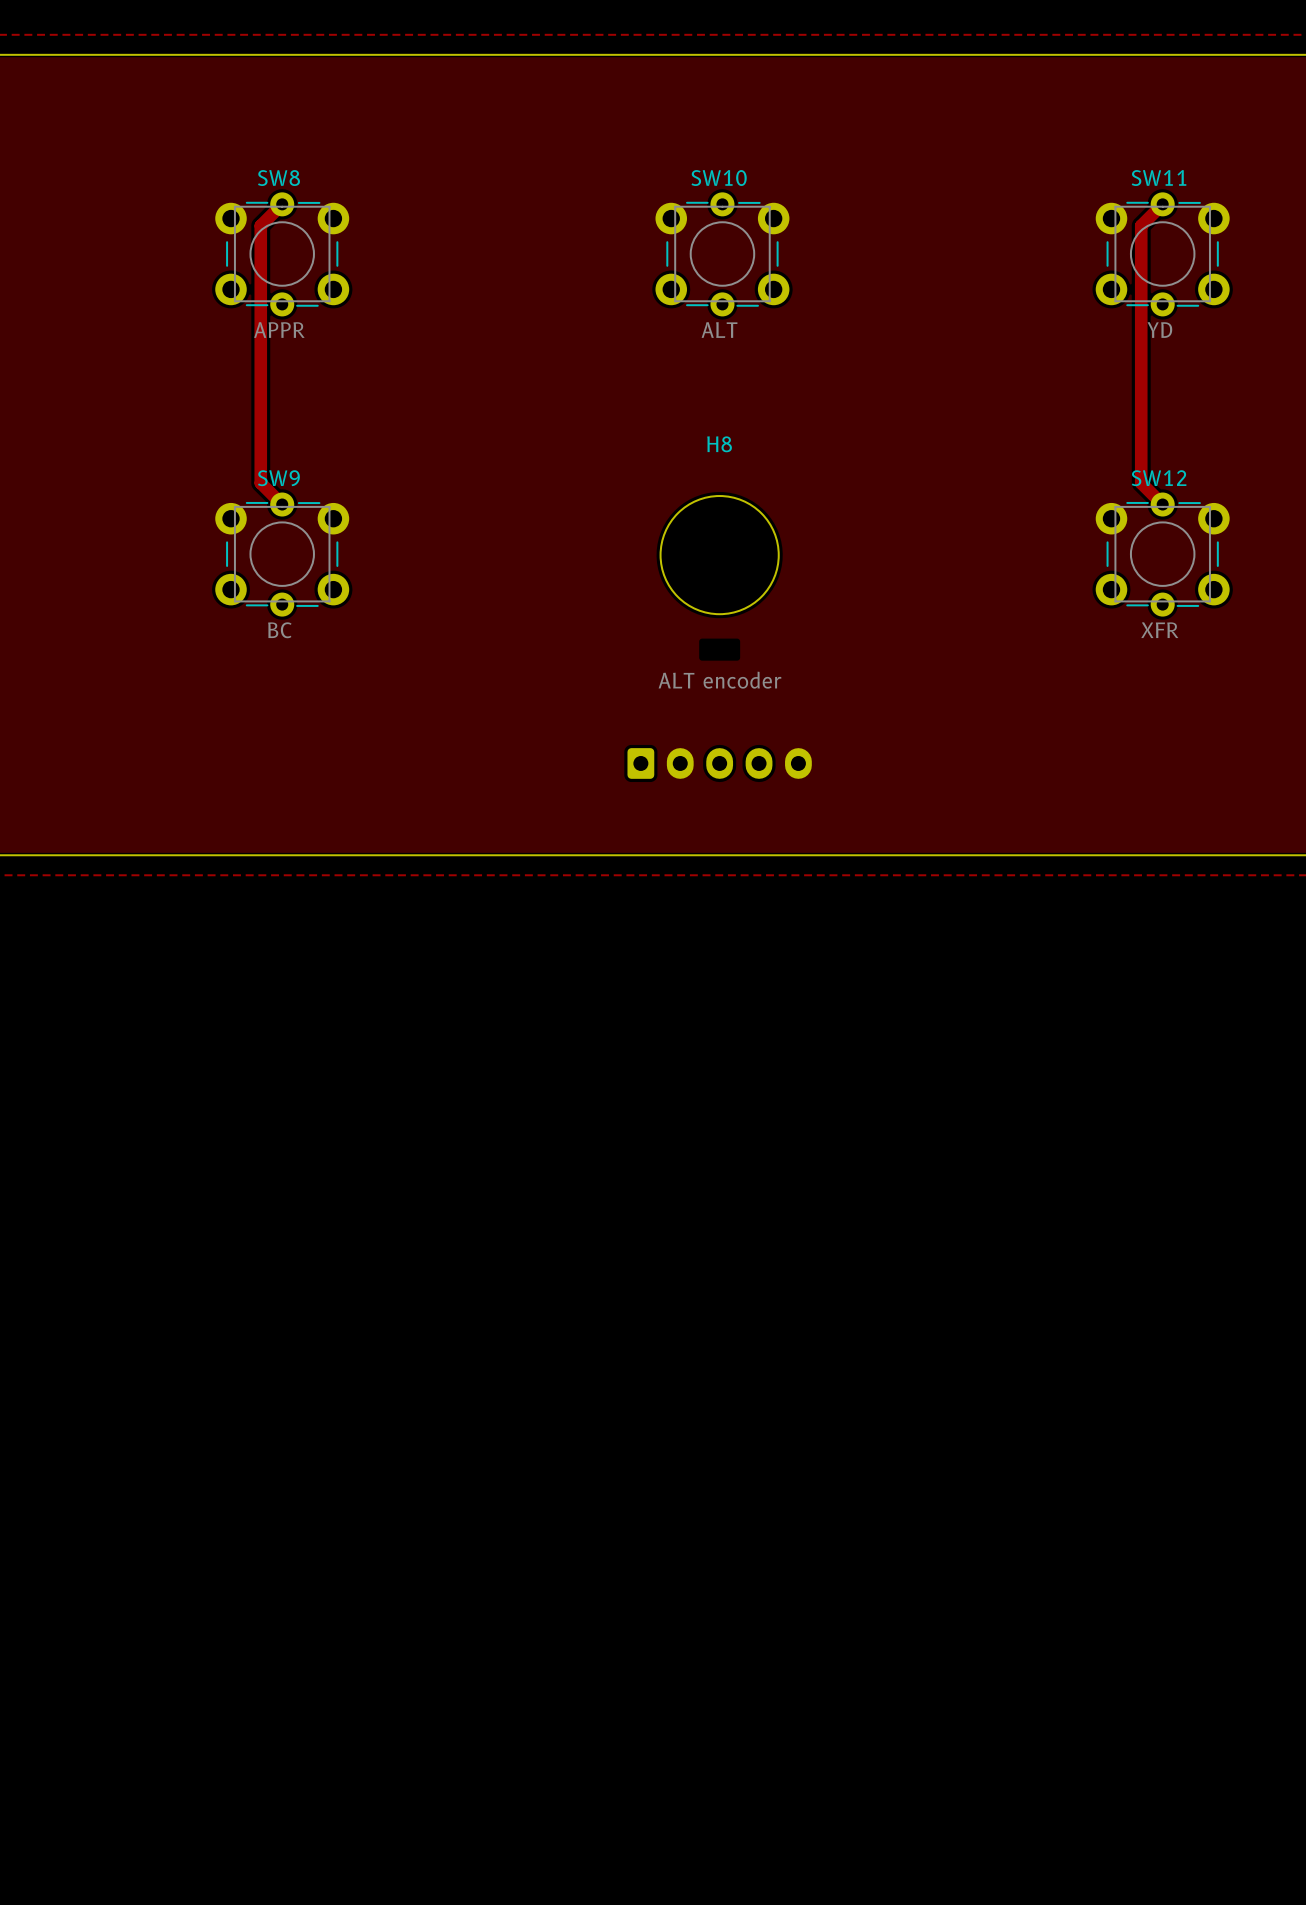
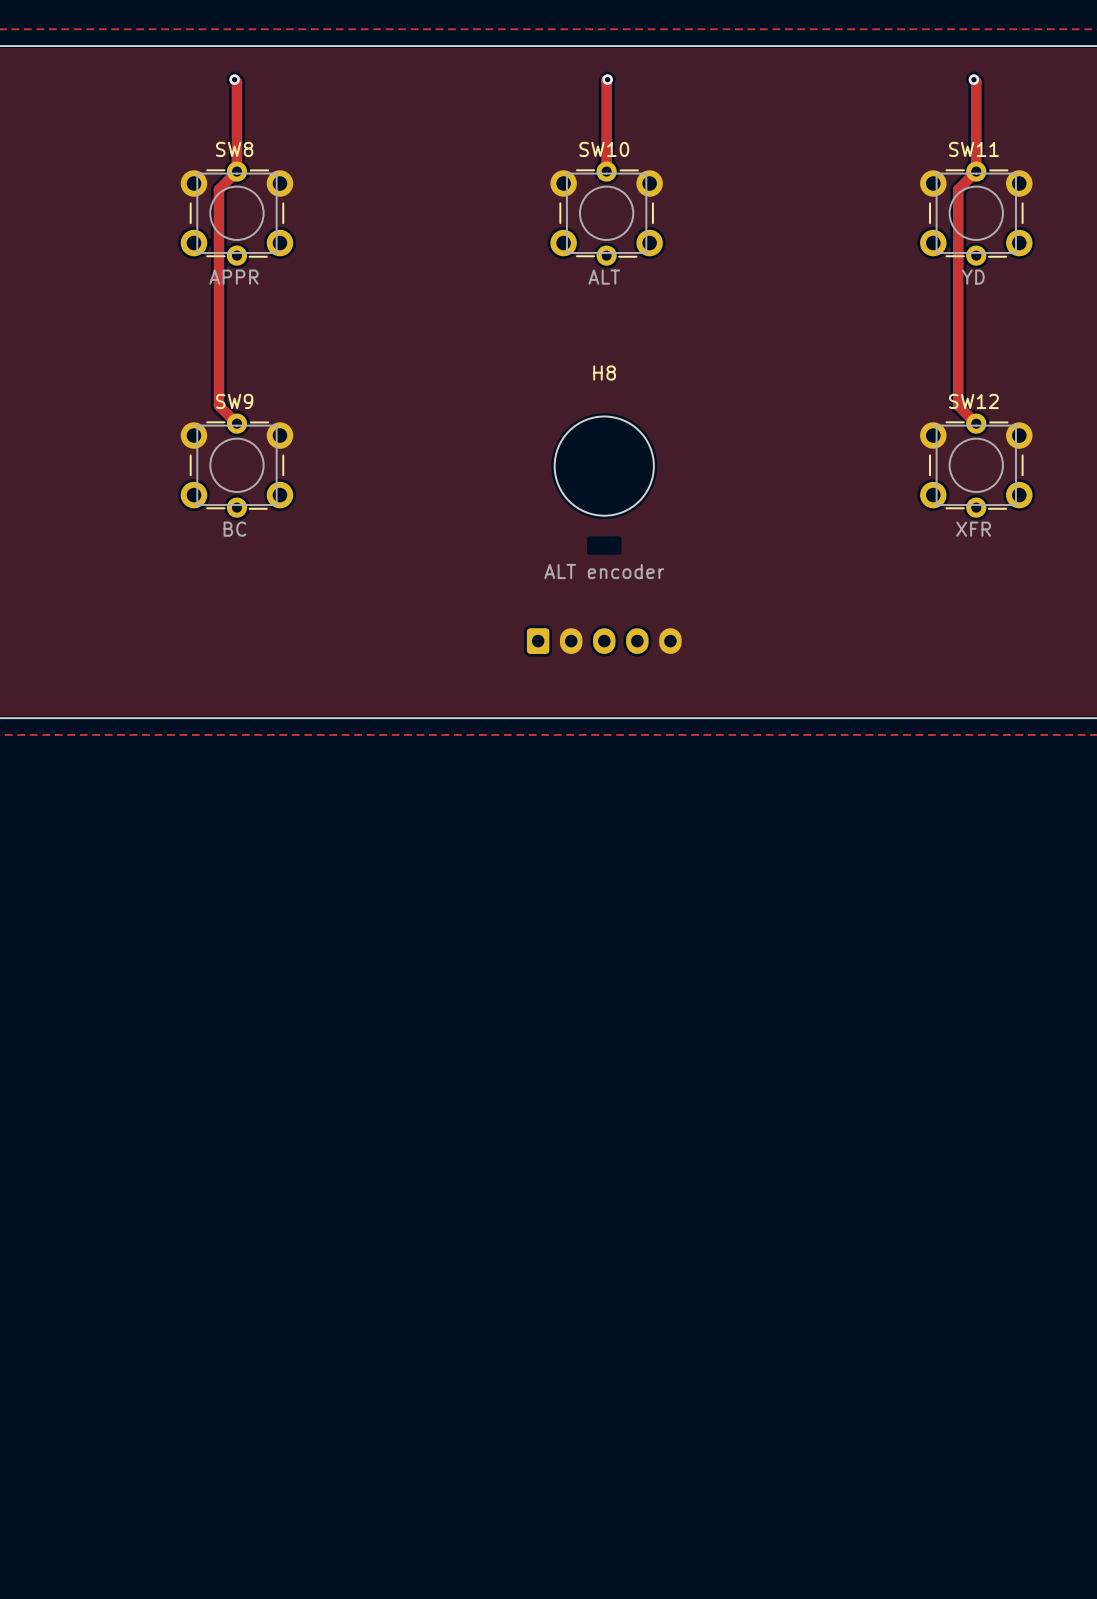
track: none -> (234, 79) (236, 82) (236, 171)
via: none -> (234, 79)
track: none -> (607, 79) (606, 171)
via: none -> (607, 79)
track: none -> (973, 79) (976, 82) (976, 171)
via: none -> (973, 79)

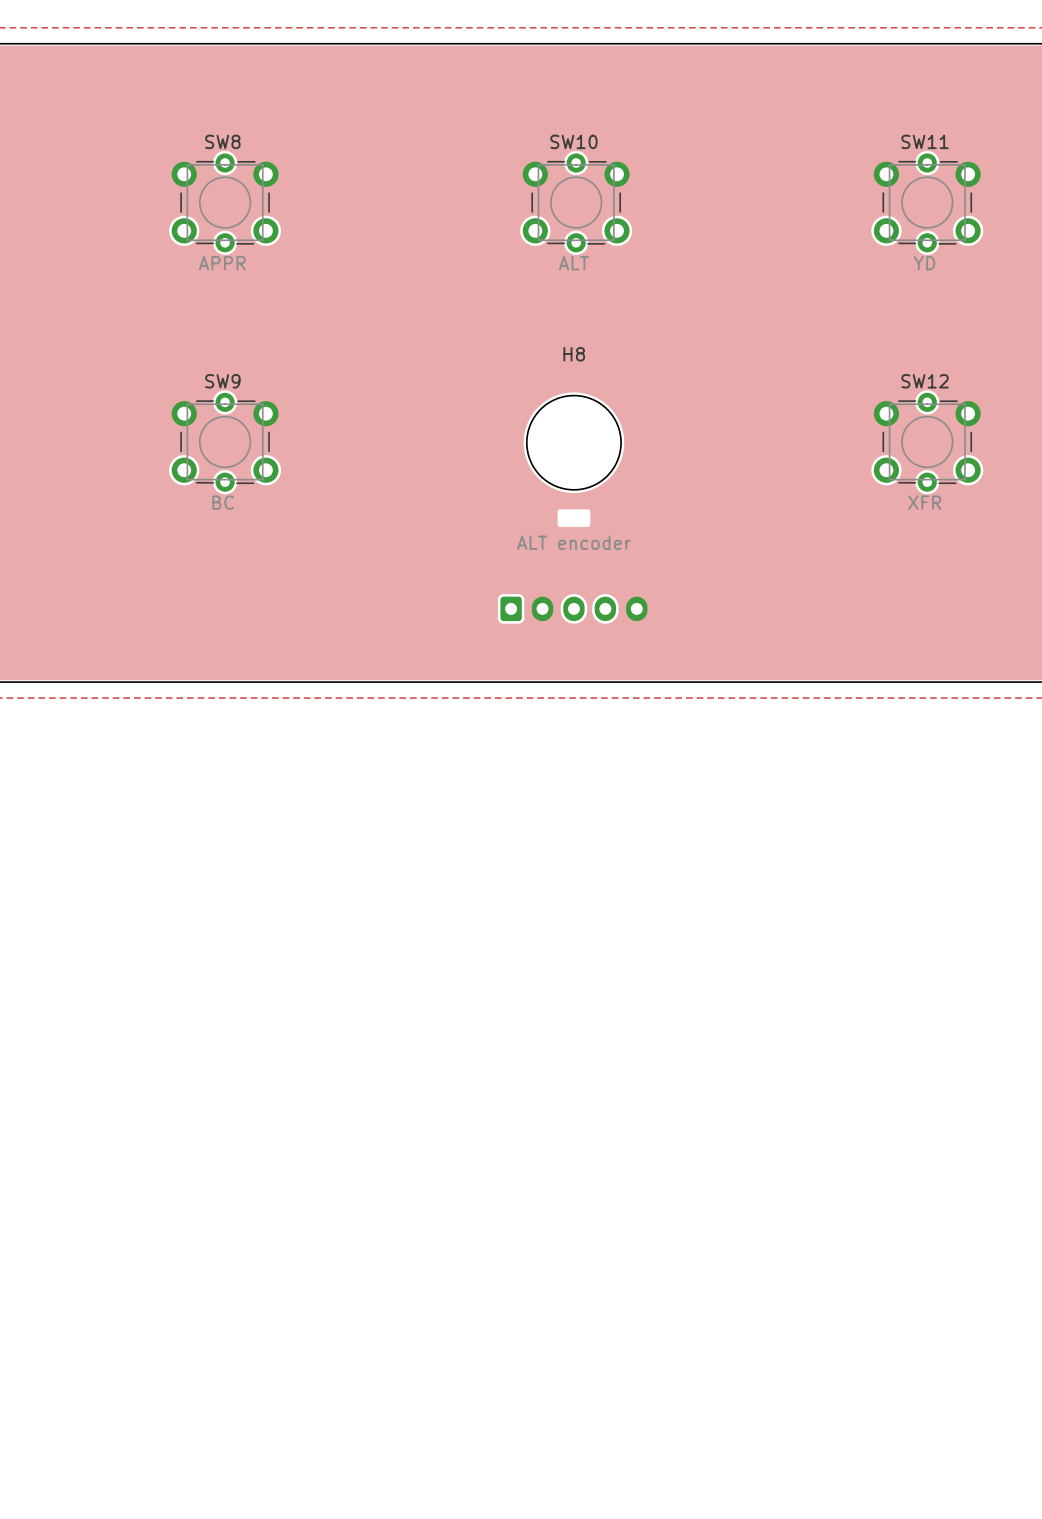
track: (234, 79) (236, 82) (236, 171) (218, 189) (218, 405) (236, 423) -> none
via: (234, 79) -> none
track: (607, 79) (606, 171) -> none
via: (607, 79) -> none
track: (973, 79) (976, 82) (976, 171) (958, 189) (958, 405) (976, 423) -> none
via: (973, 79) -> none

